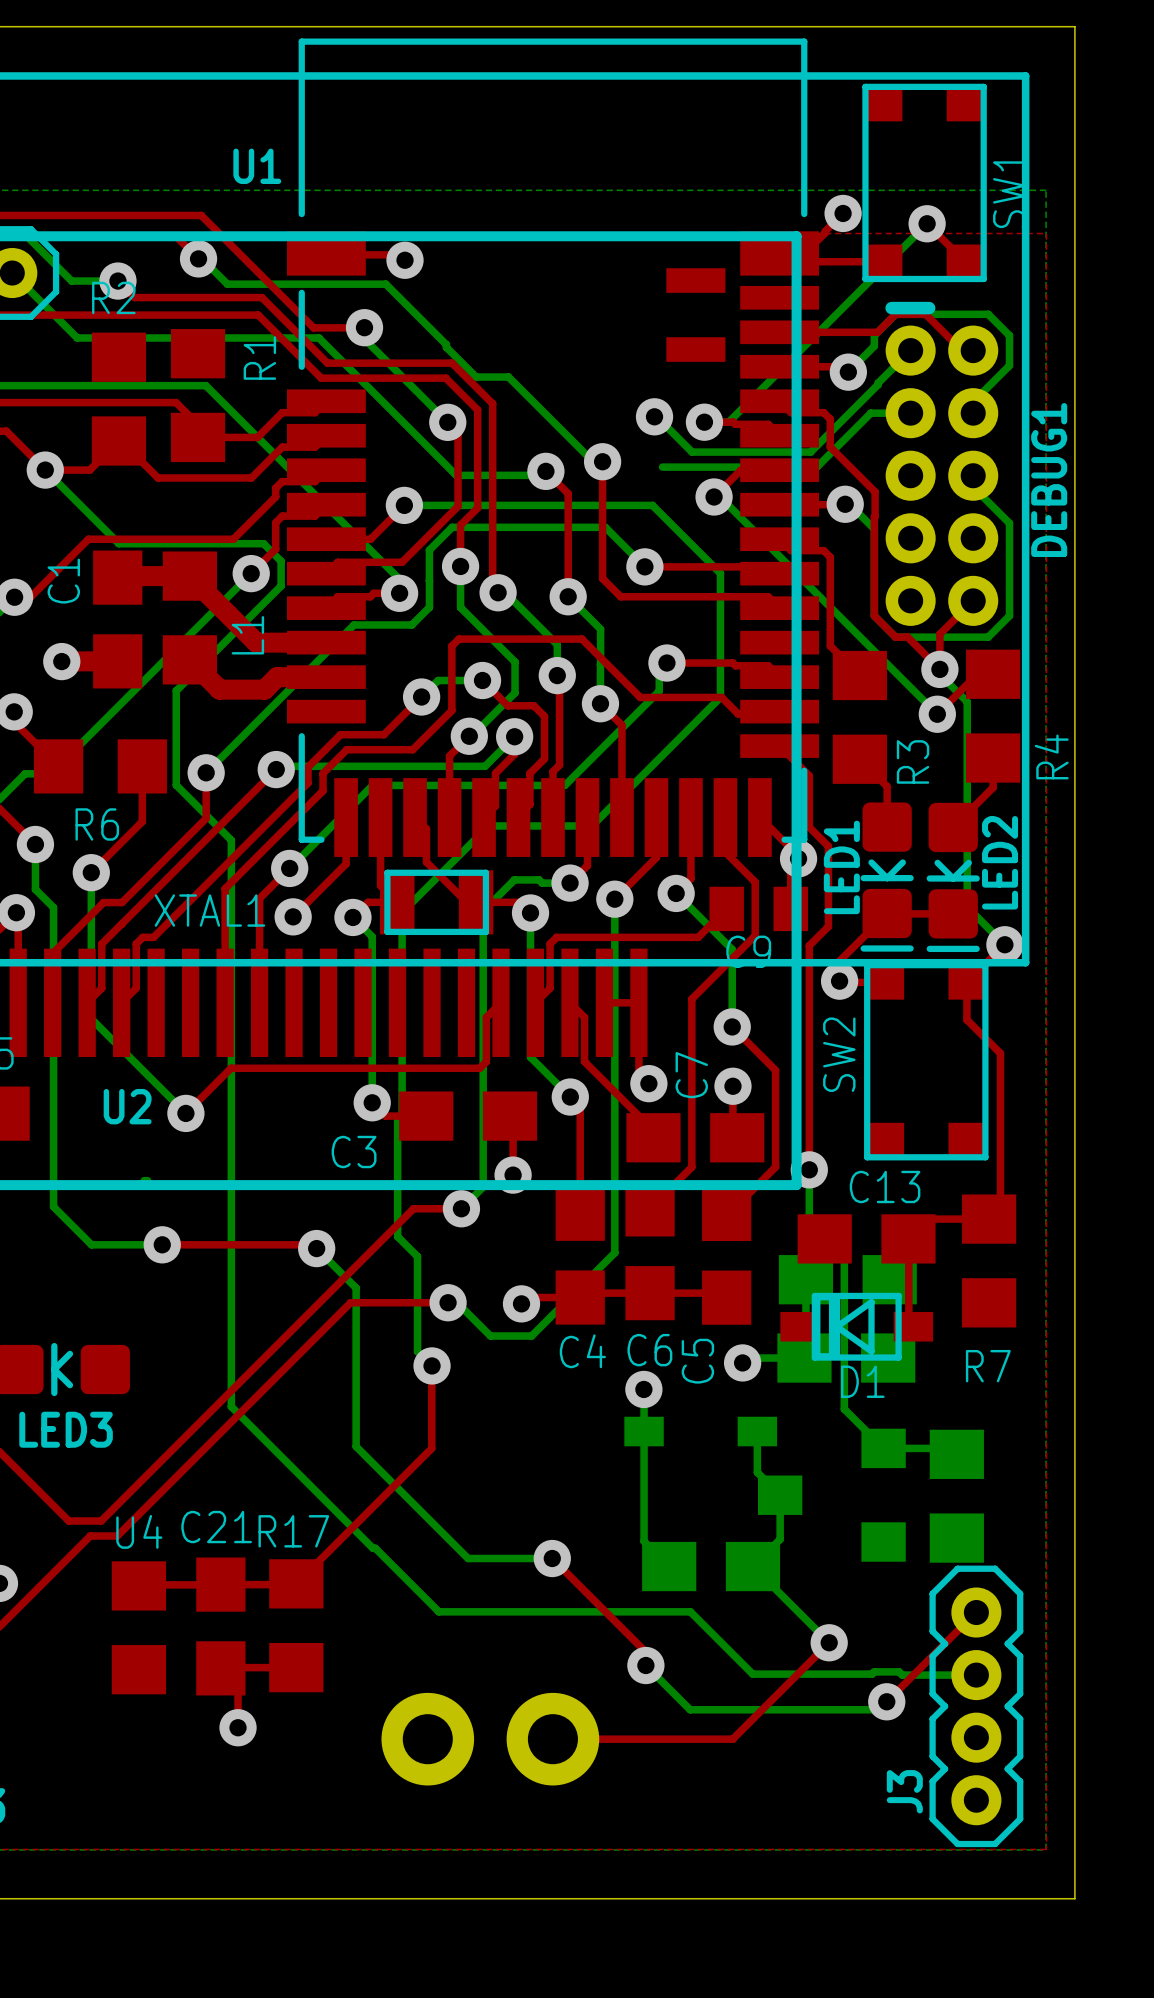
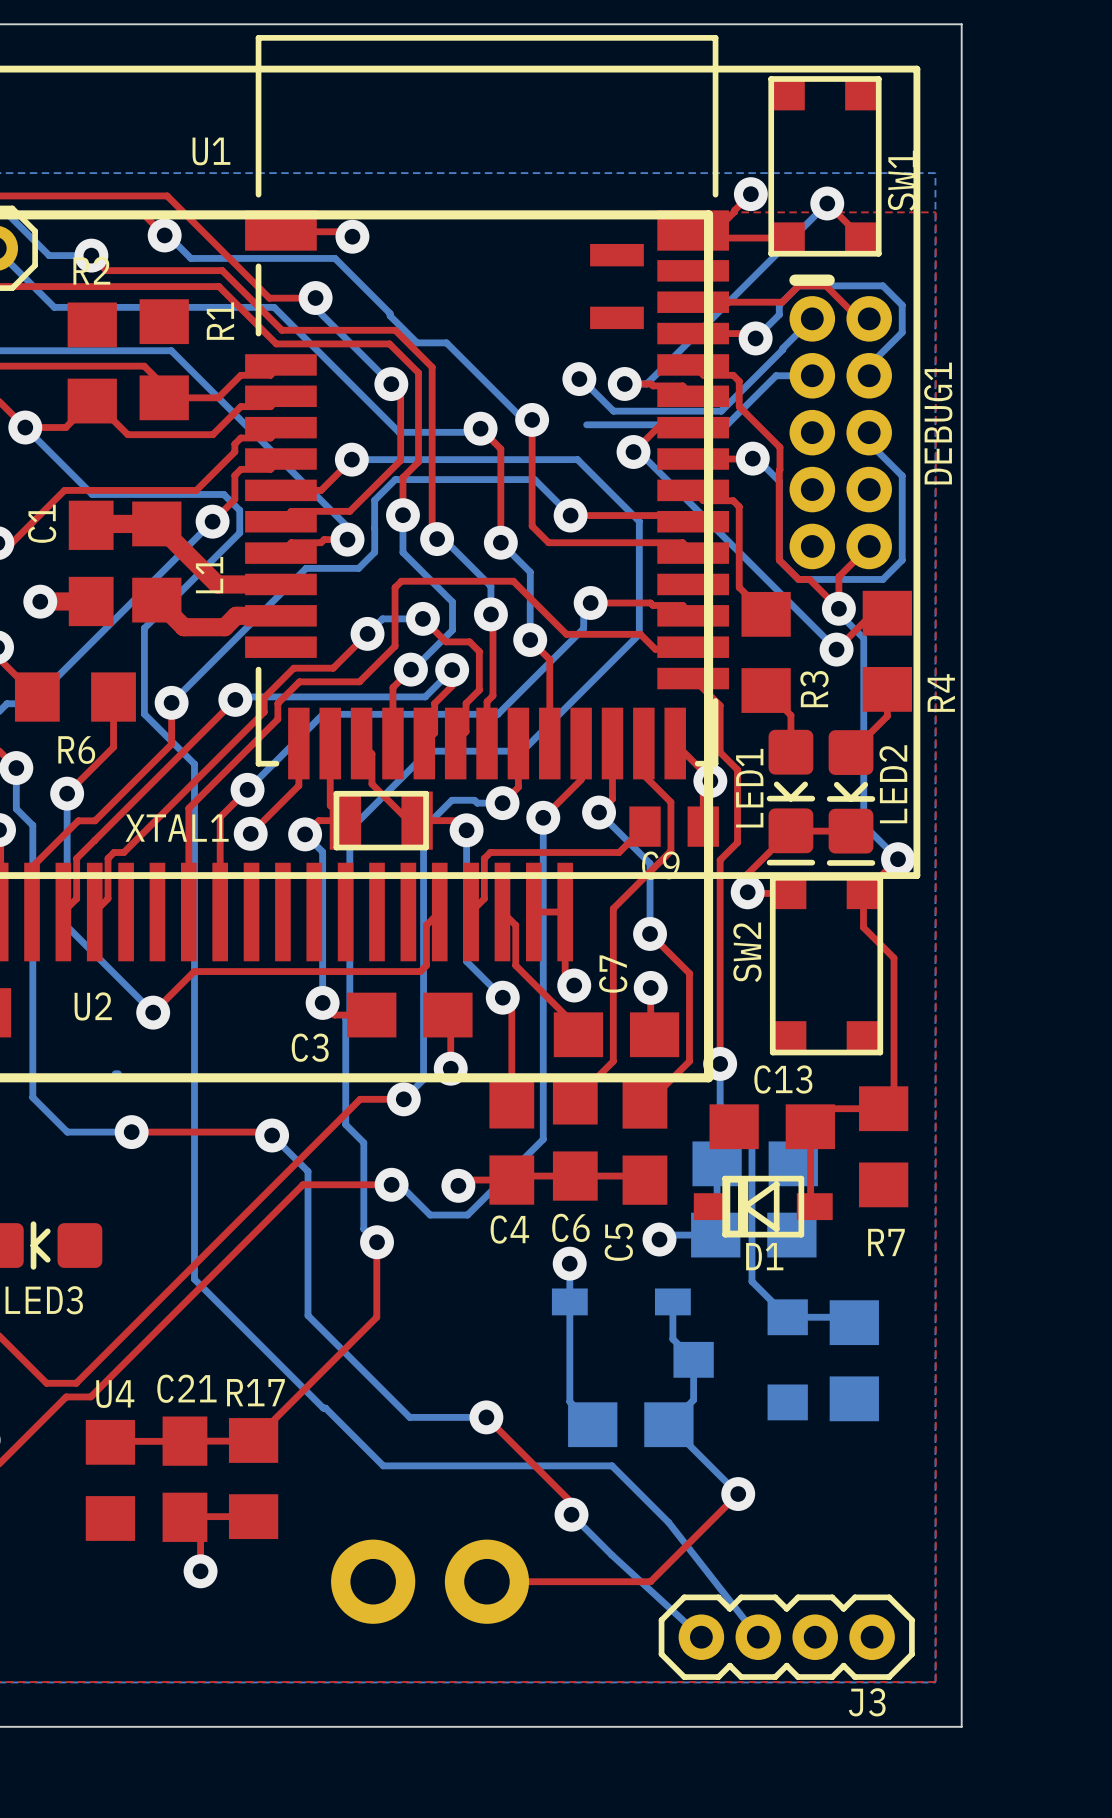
top track: (976, 1612) (886, 1701) -> none
bottom track: (752, 1674) (872, 1674) (874, 1671) (899, 1671) (902, 1675) (976, 1675) -> (668, 1522) (758, 1637)
bottom track: (886, 1701) (878, 1709) (690, 1709) -> (701, 1637) (611, 1554)
via: (886, 1701) -> none
J3 rotation: 0° (976, 1706) -> 90° clockwise (786, 1637)
J3 name position: J3 (904, 1791) -> J3 (867, 1702)

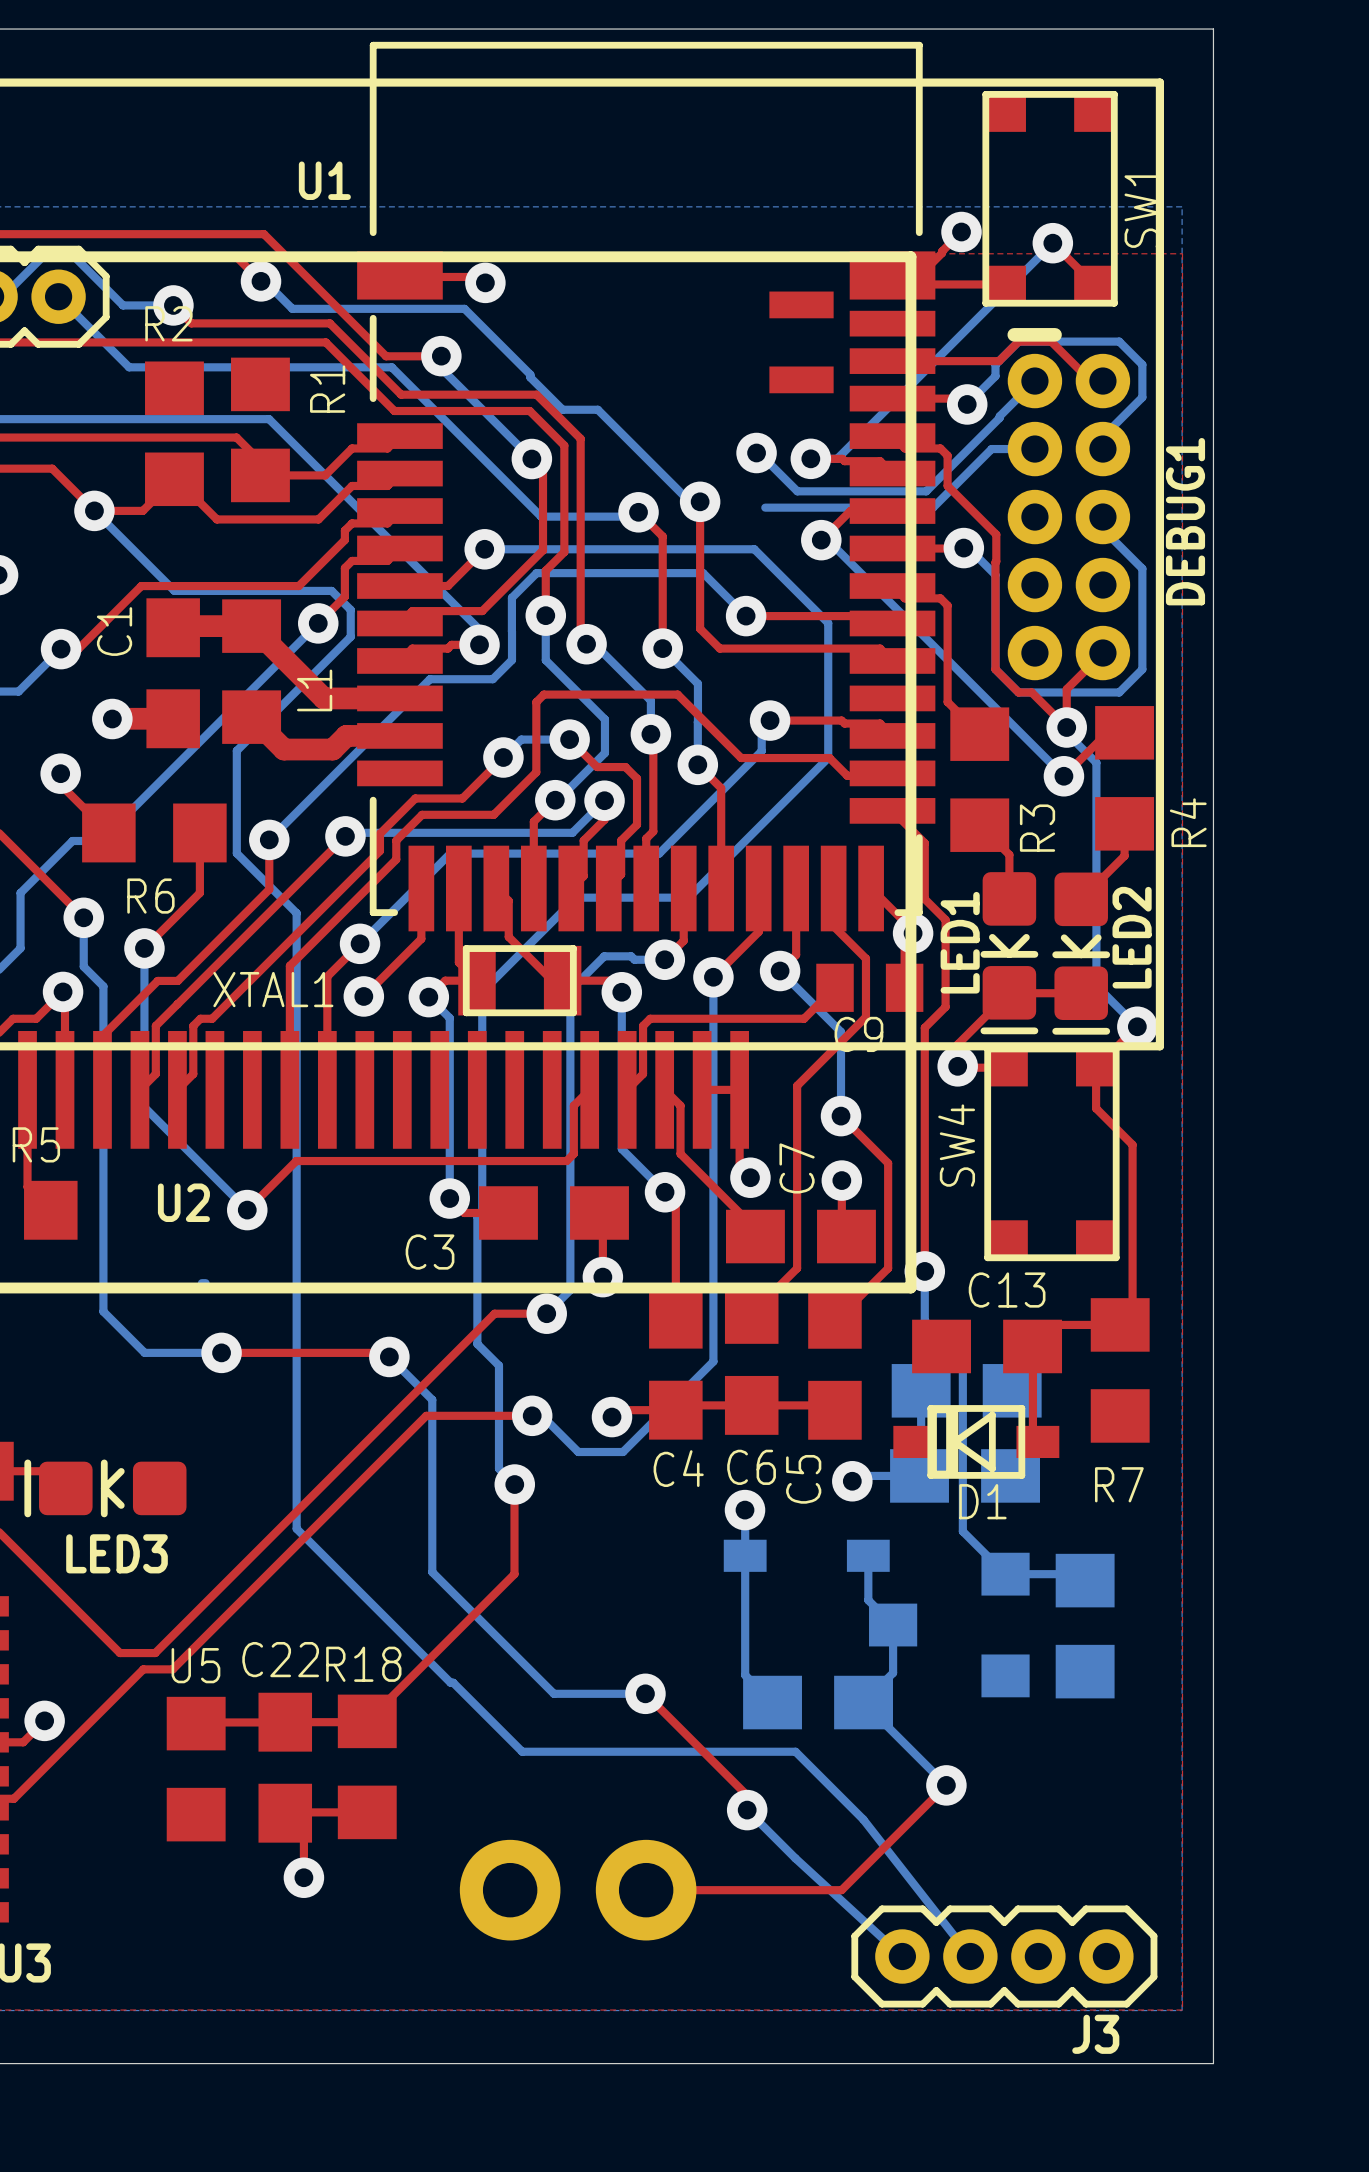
SW2 name: SW2 (747, 952) -> SW4 (956, 1145)
C21 name: C21 (186, 1388) -> C22 (280, 1659)
R17 name: R17 (255, 1392) -> R18 (363, 1664)
U4 name: U4 (115, 1394) -> U5 (195, 1665)

